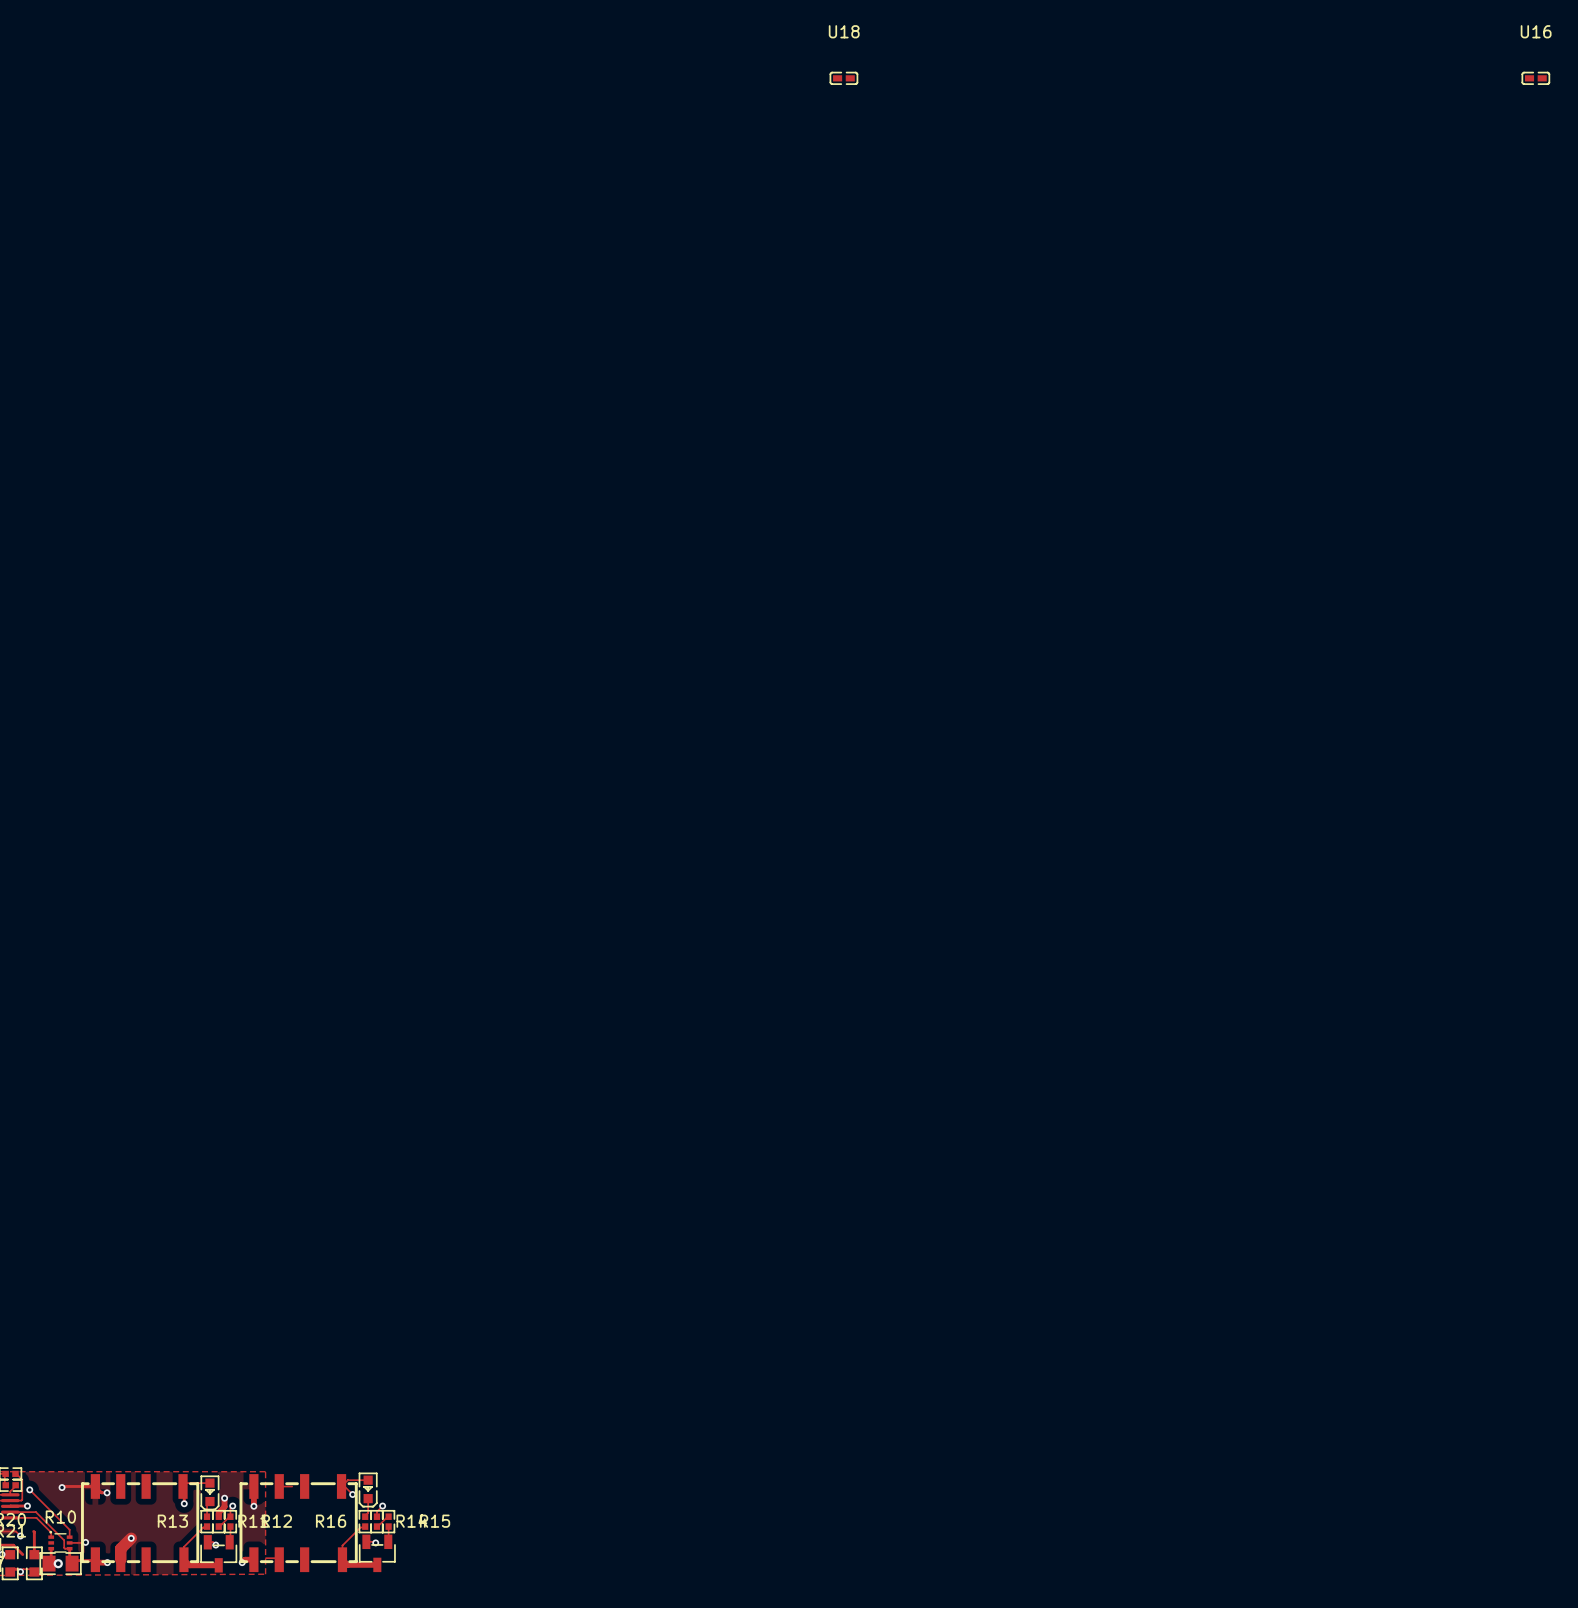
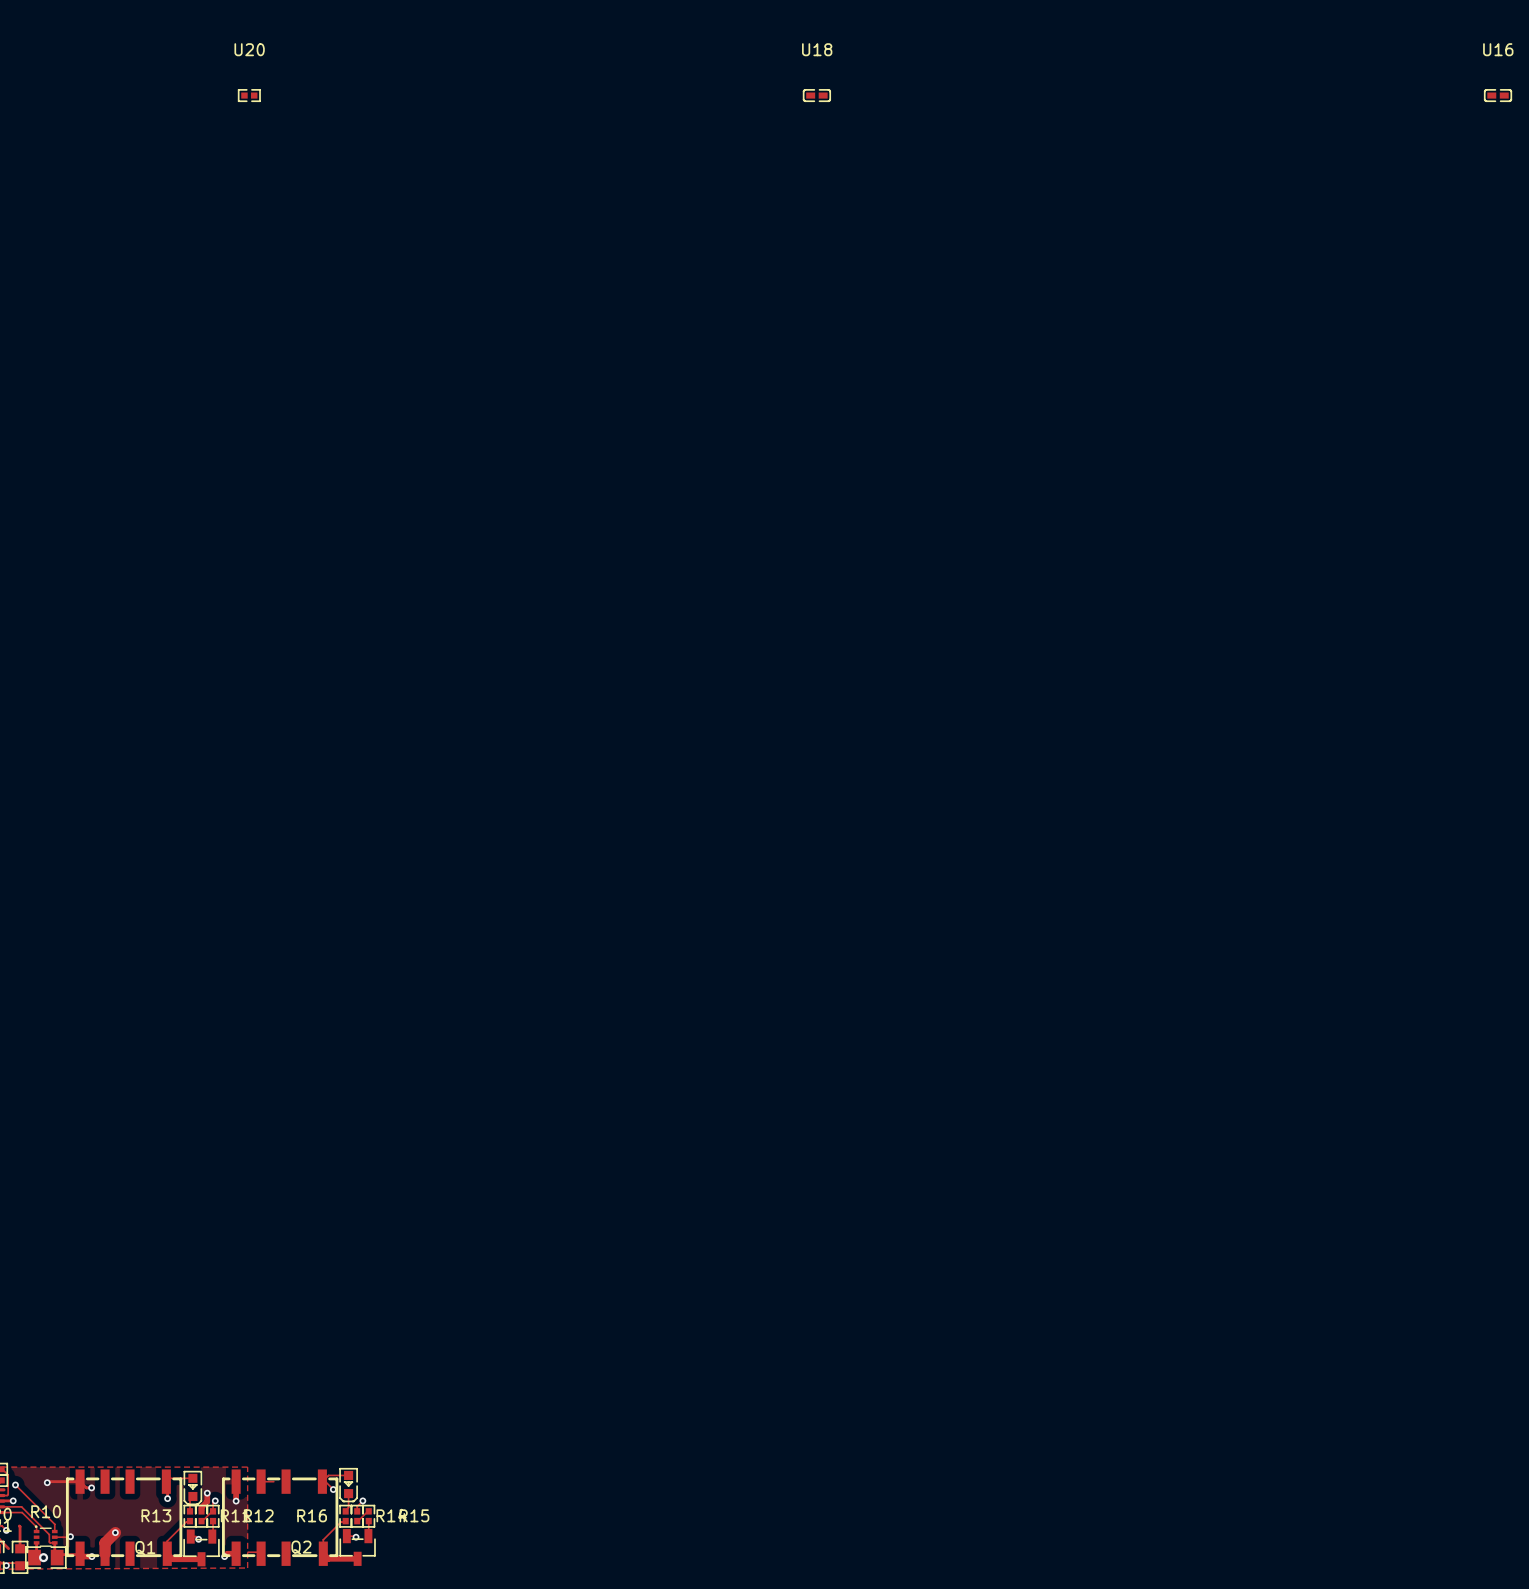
U20: none -> (249, 95)
Q1 name: none -> Q1 (145, 1548)
Q2 name: none -> Q2 (301, 1547)

